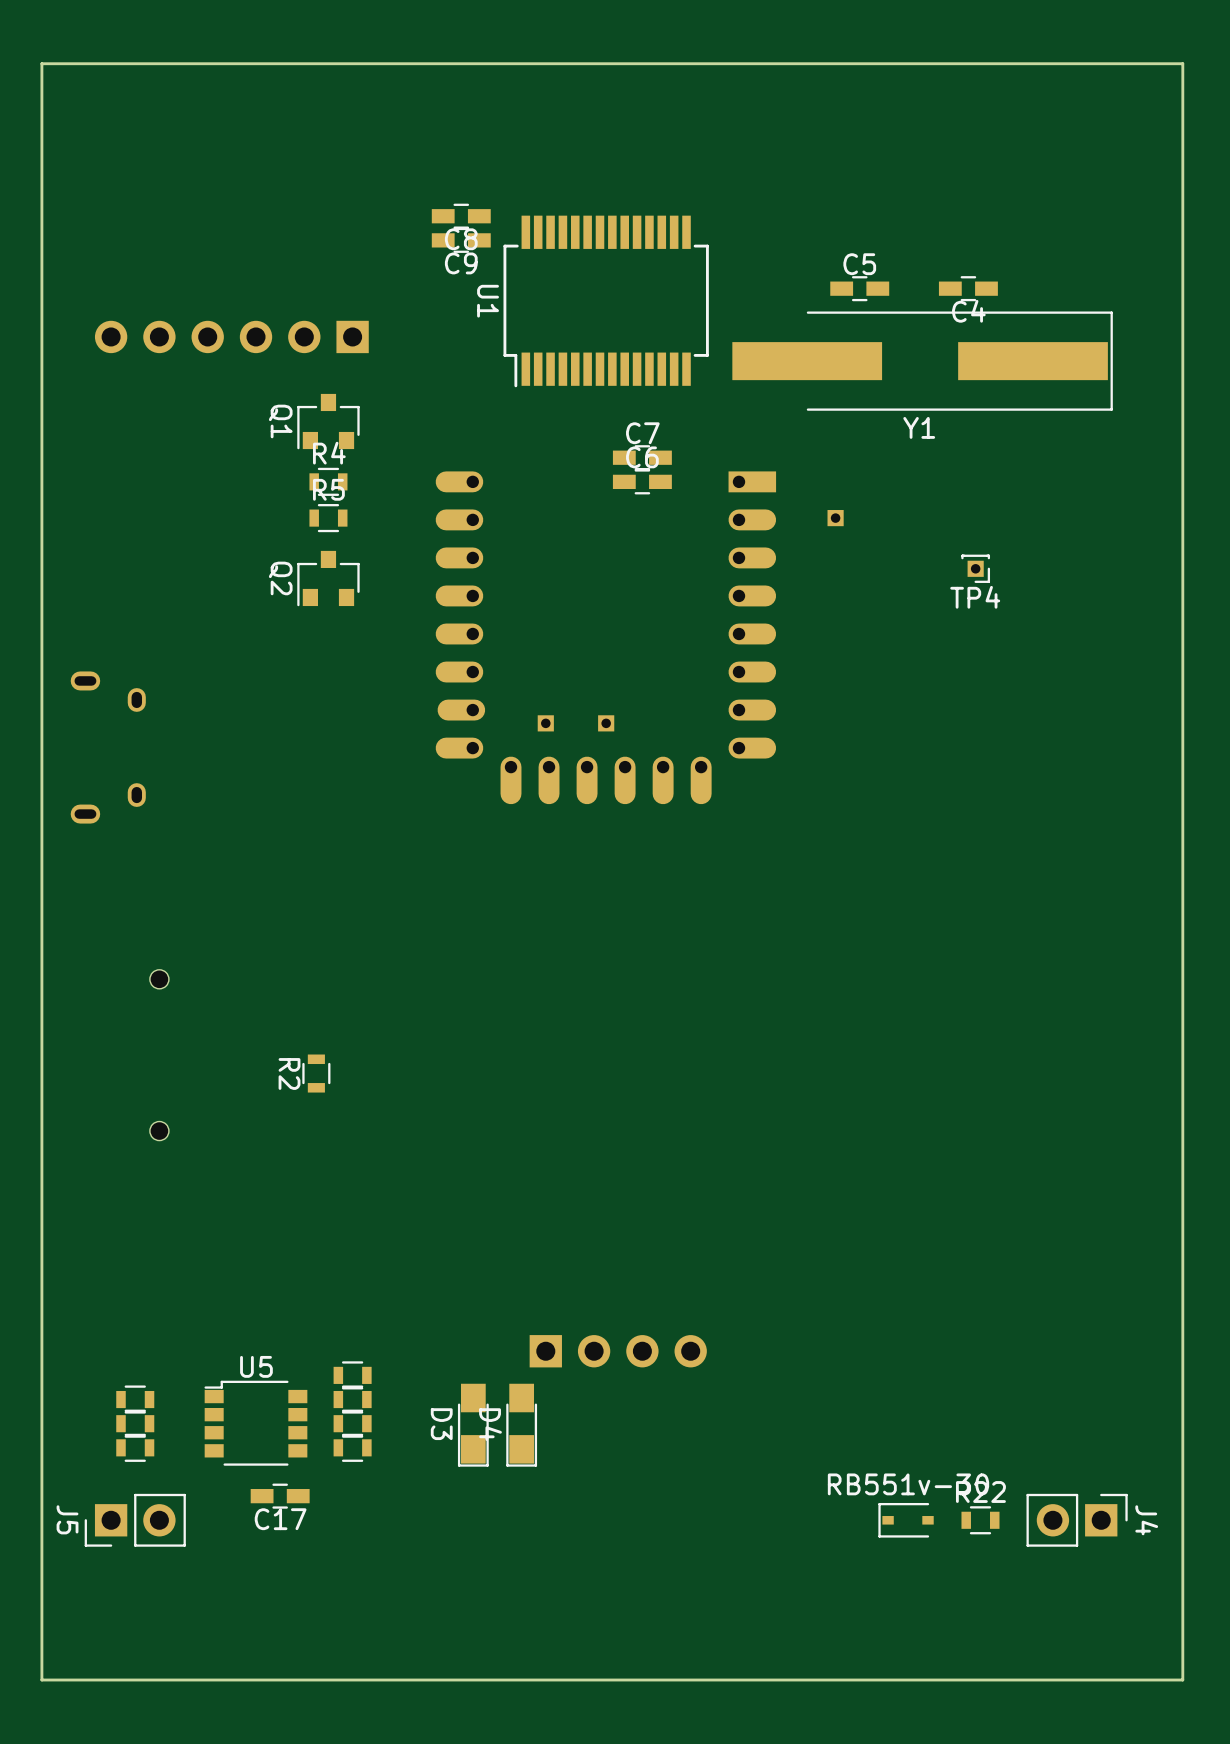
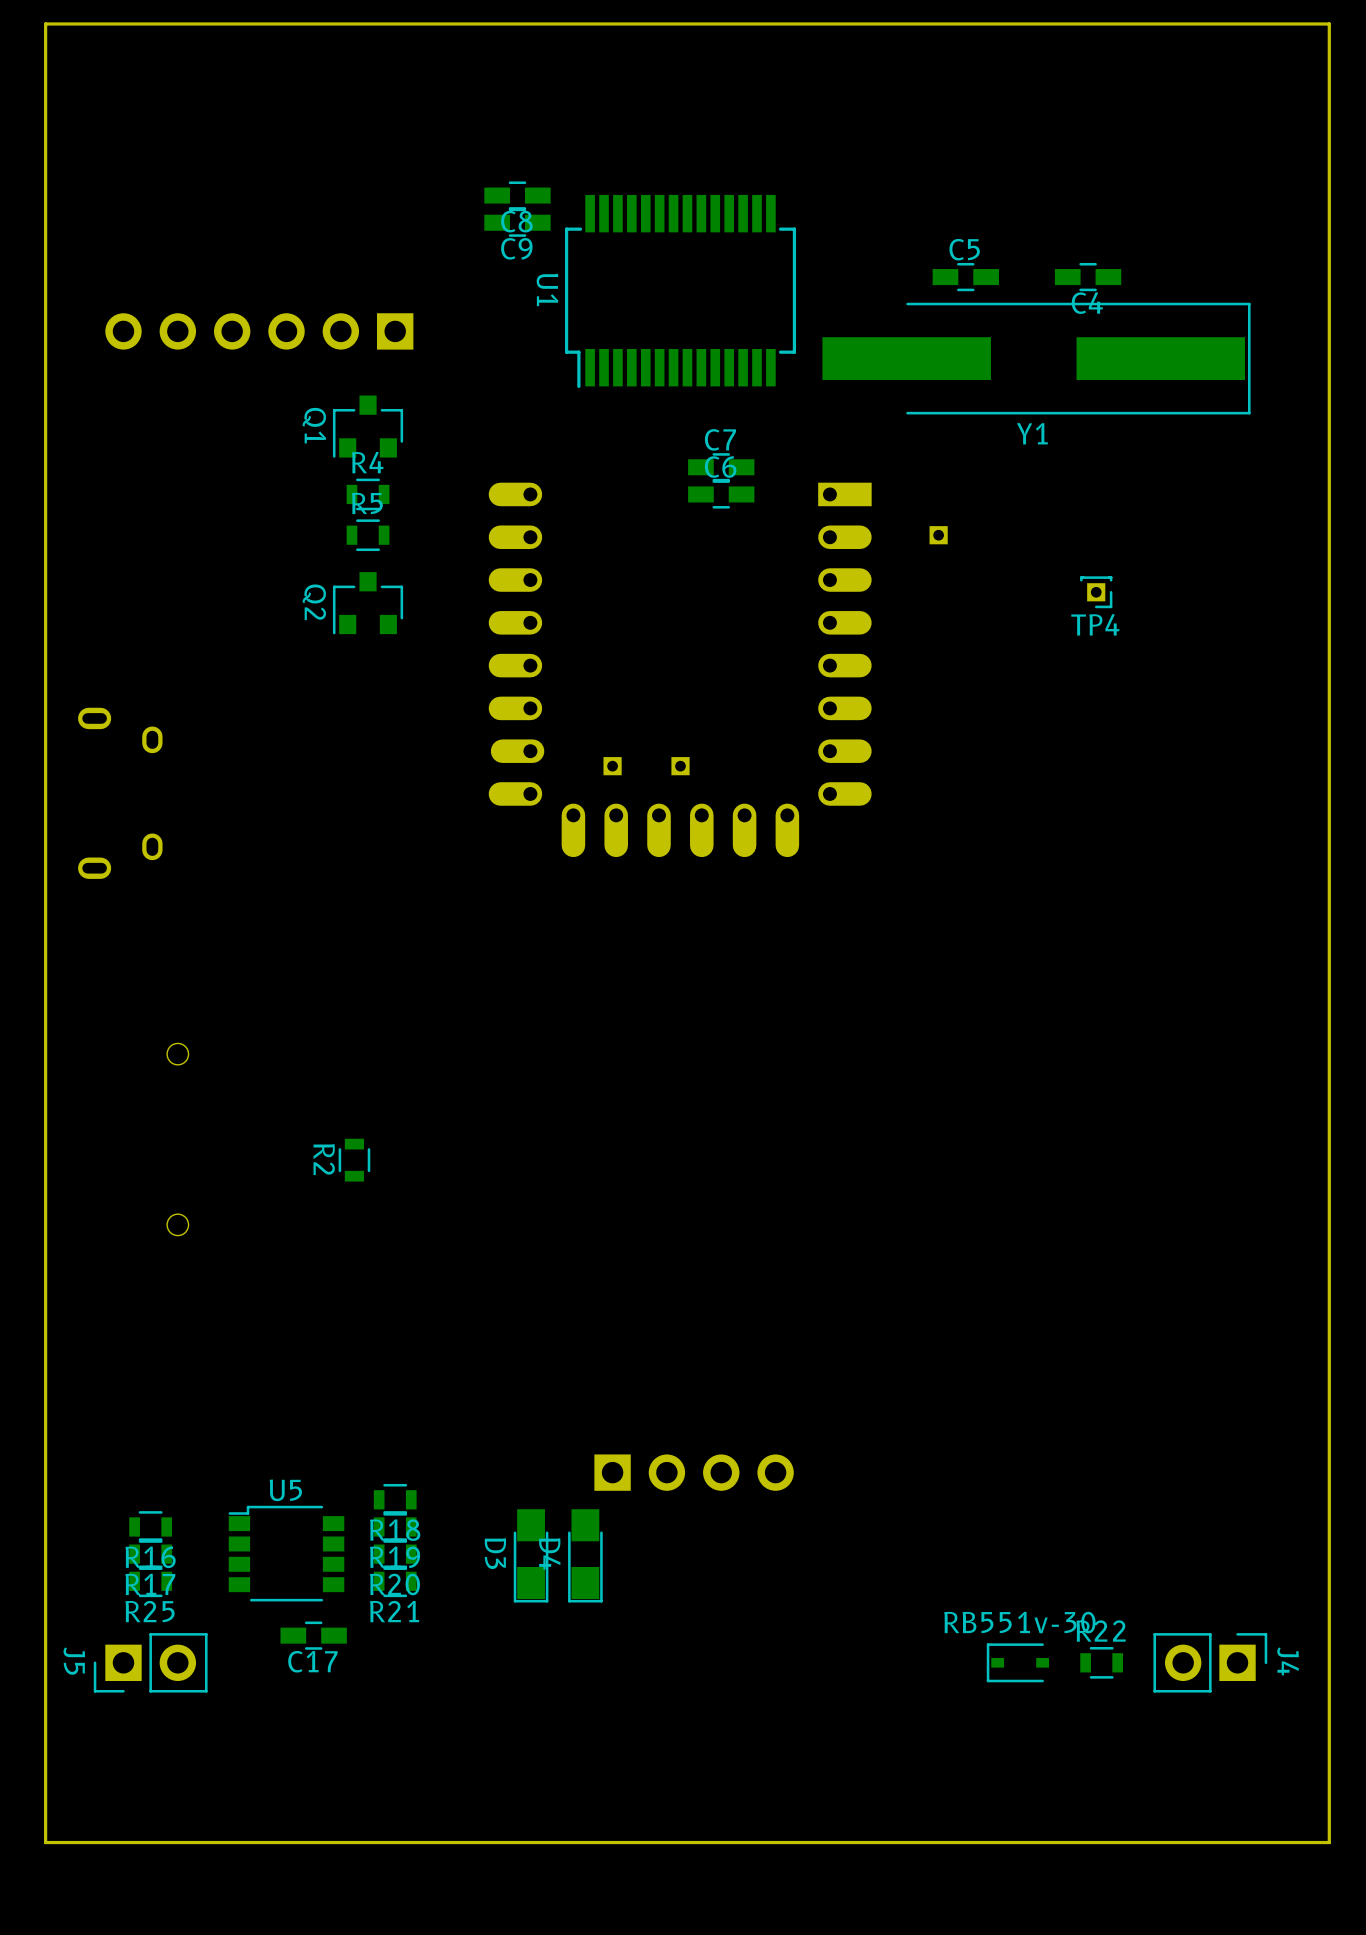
R18 name: none -> R18 (395, 1530)
R16 name: none -> R16 (150, 1557)
R19 name: none -> R19 (395, 1557)
R17 name: none -> R17 (150, 1584)
R20 name: none -> R20 (394, 1584)
R25 name: none -> R25 (149, 1611)
R21 name: none -> R21 (394, 1611)

